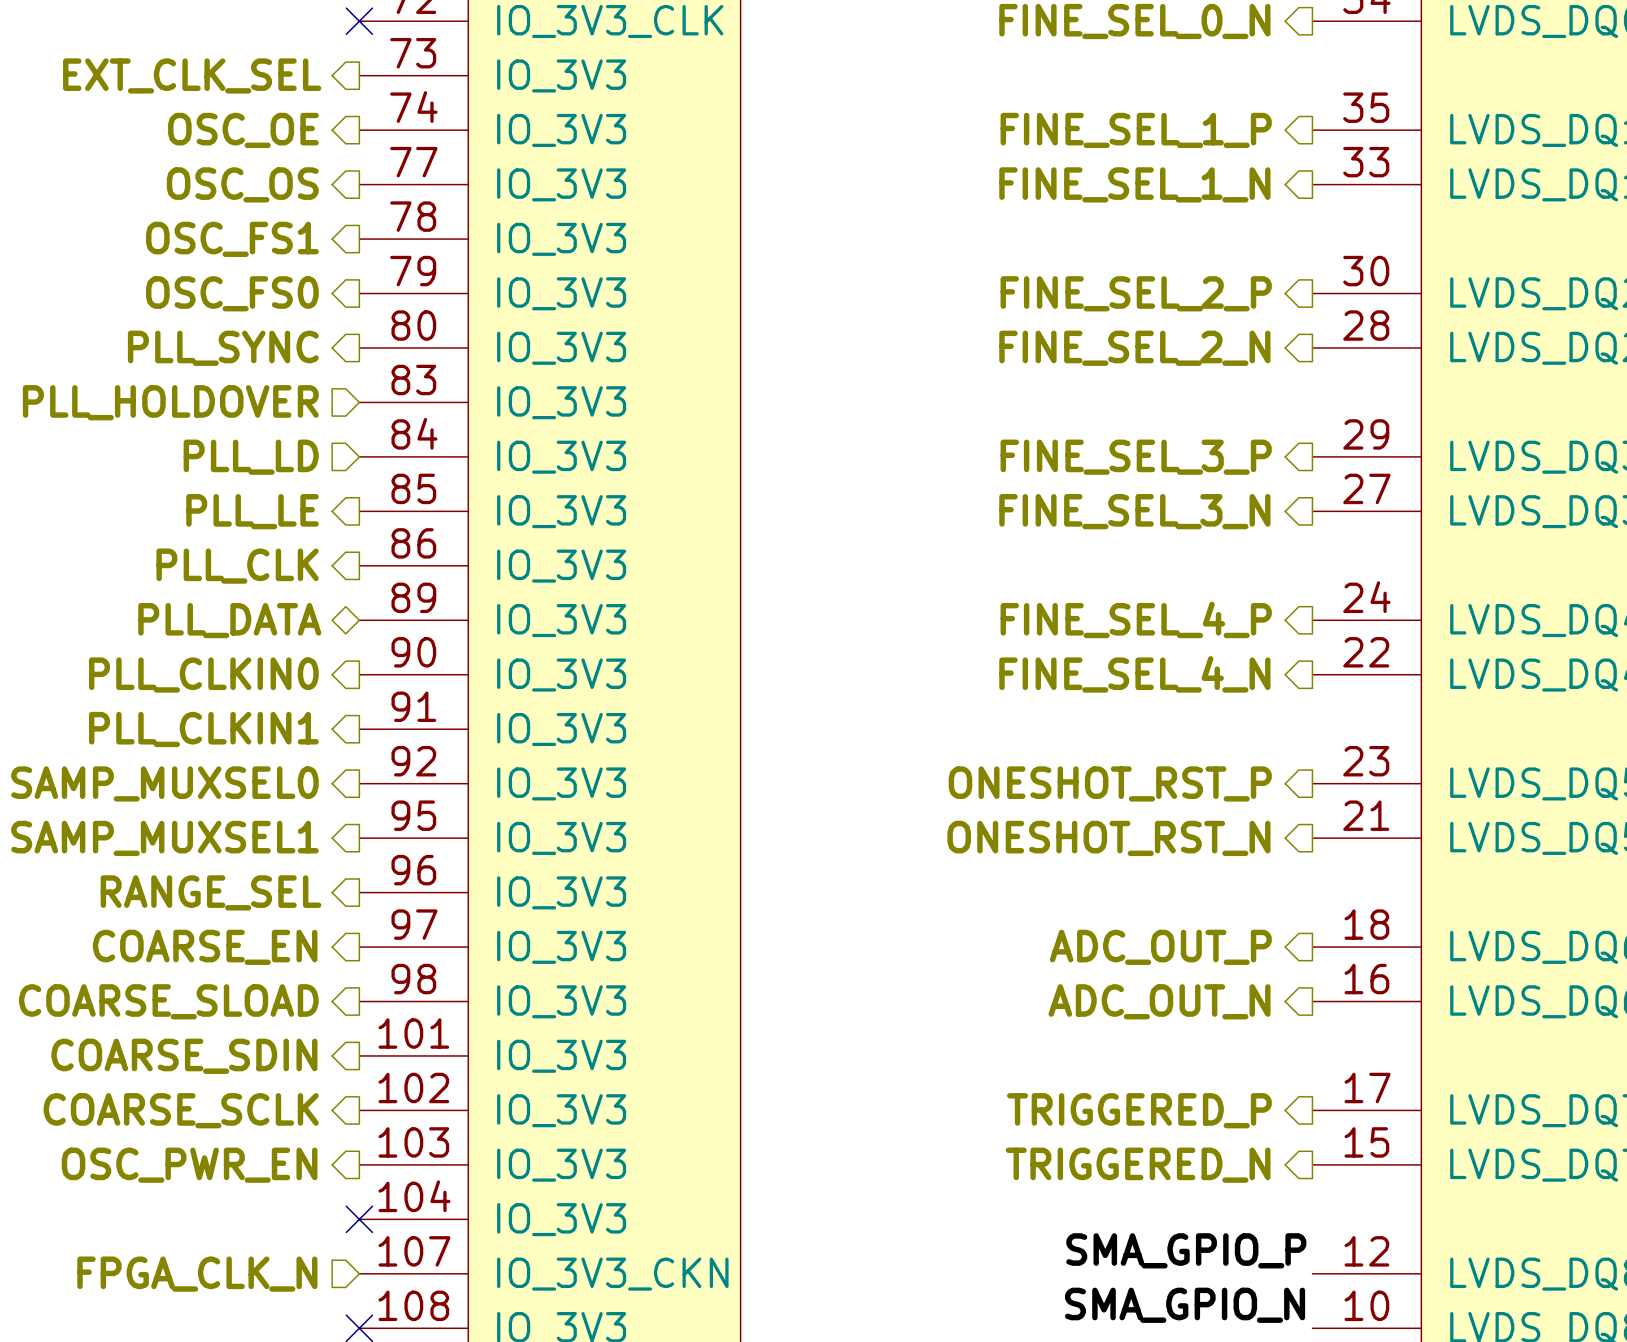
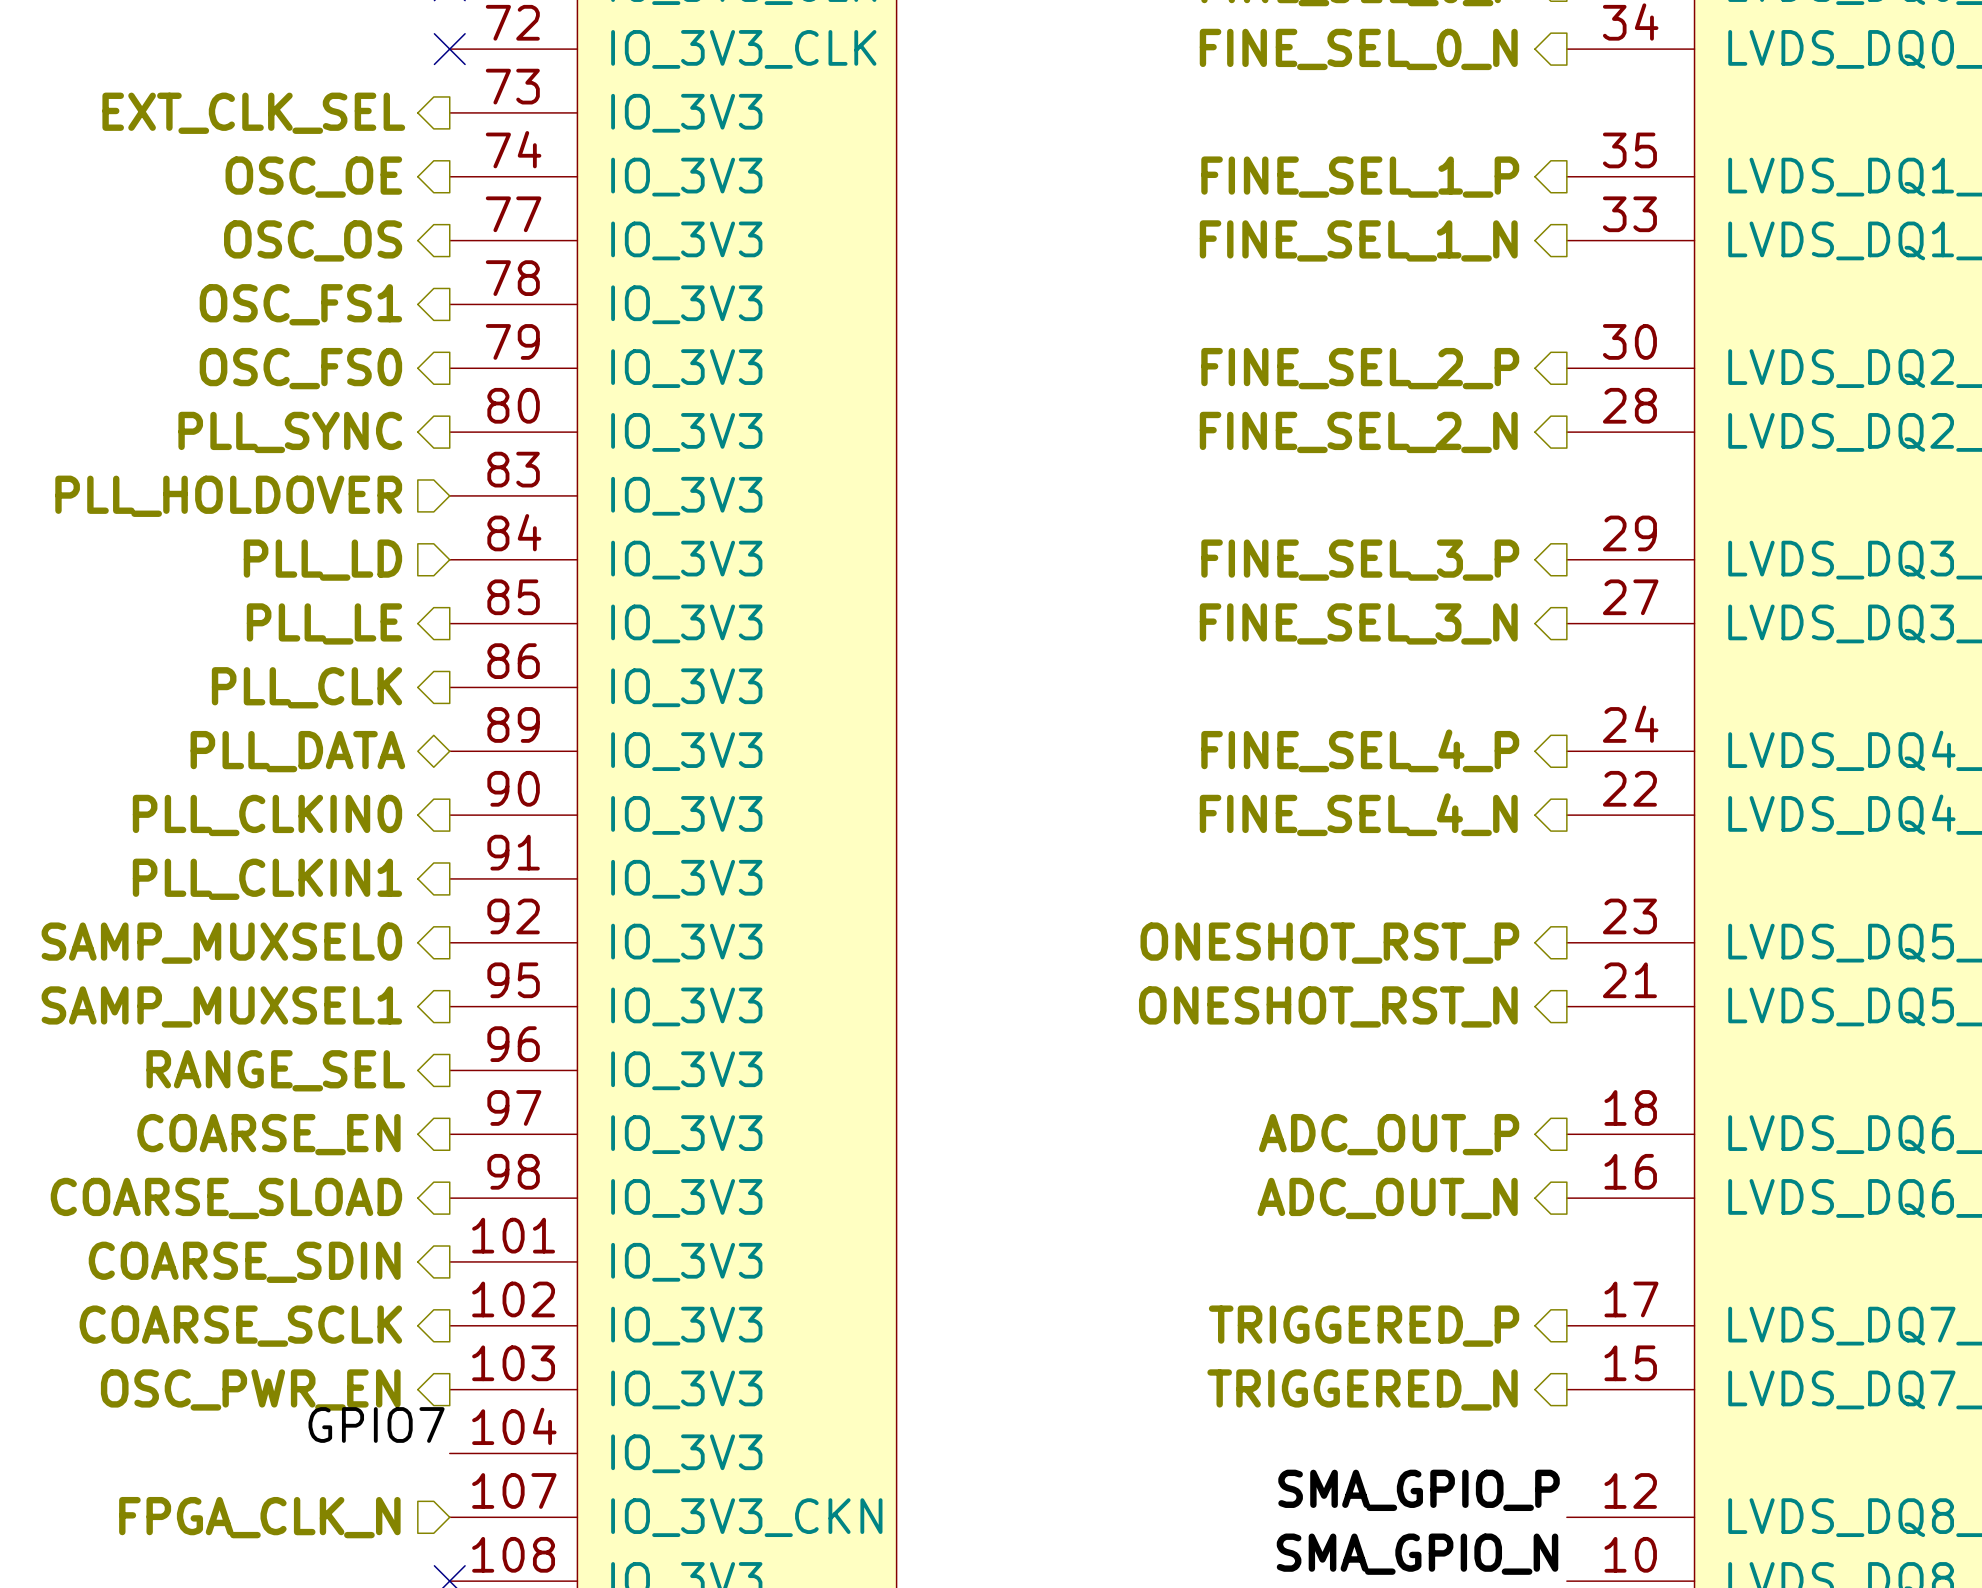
label: none -> GPIO7 (376, 1424)
no-connect mark: (359, 1219) -> none

